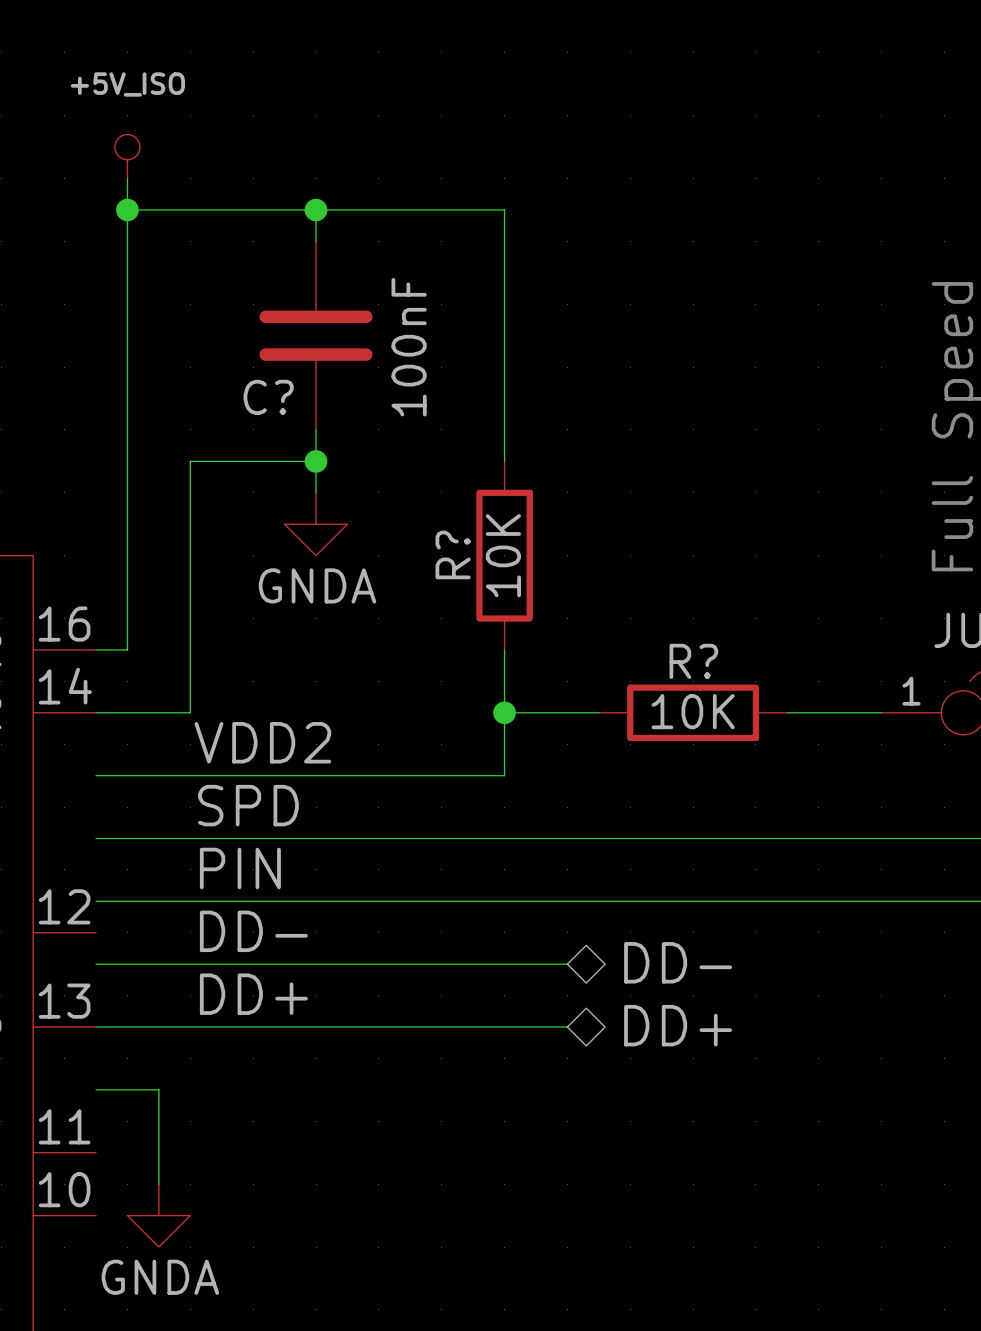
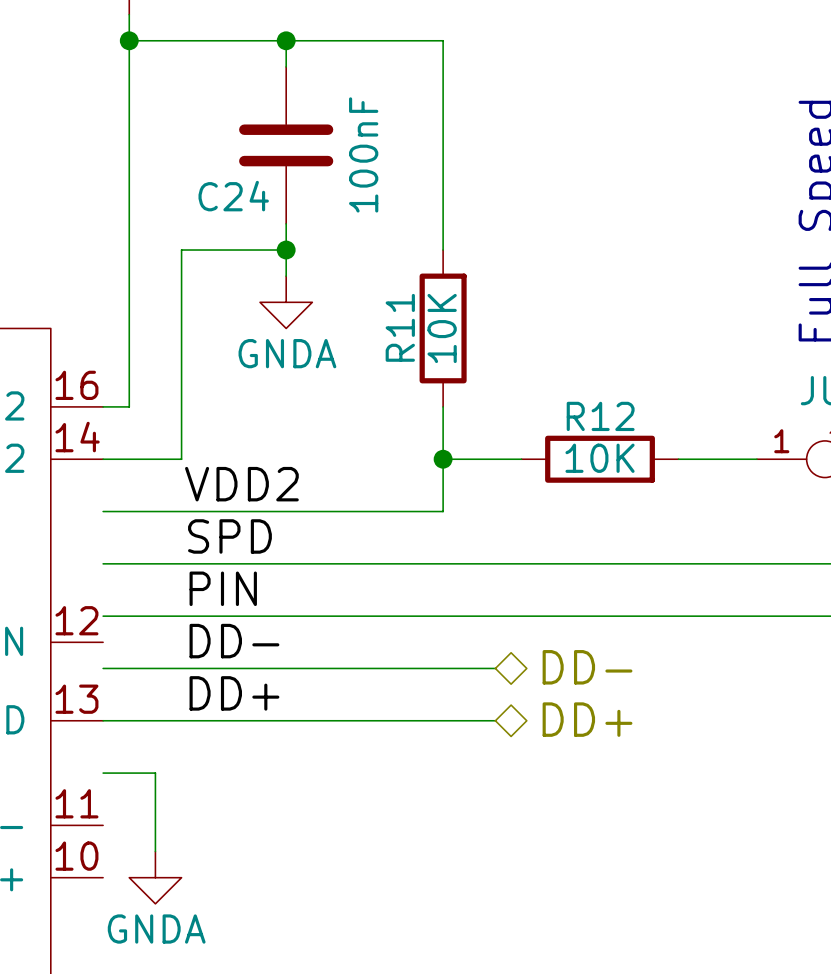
C? name: C? (268, 397) -> C24 (233, 196)
R? name: R? (453, 554) -> R11 (400, 327)
R? name: R? (693, 661) -> R12 (600, 416)

